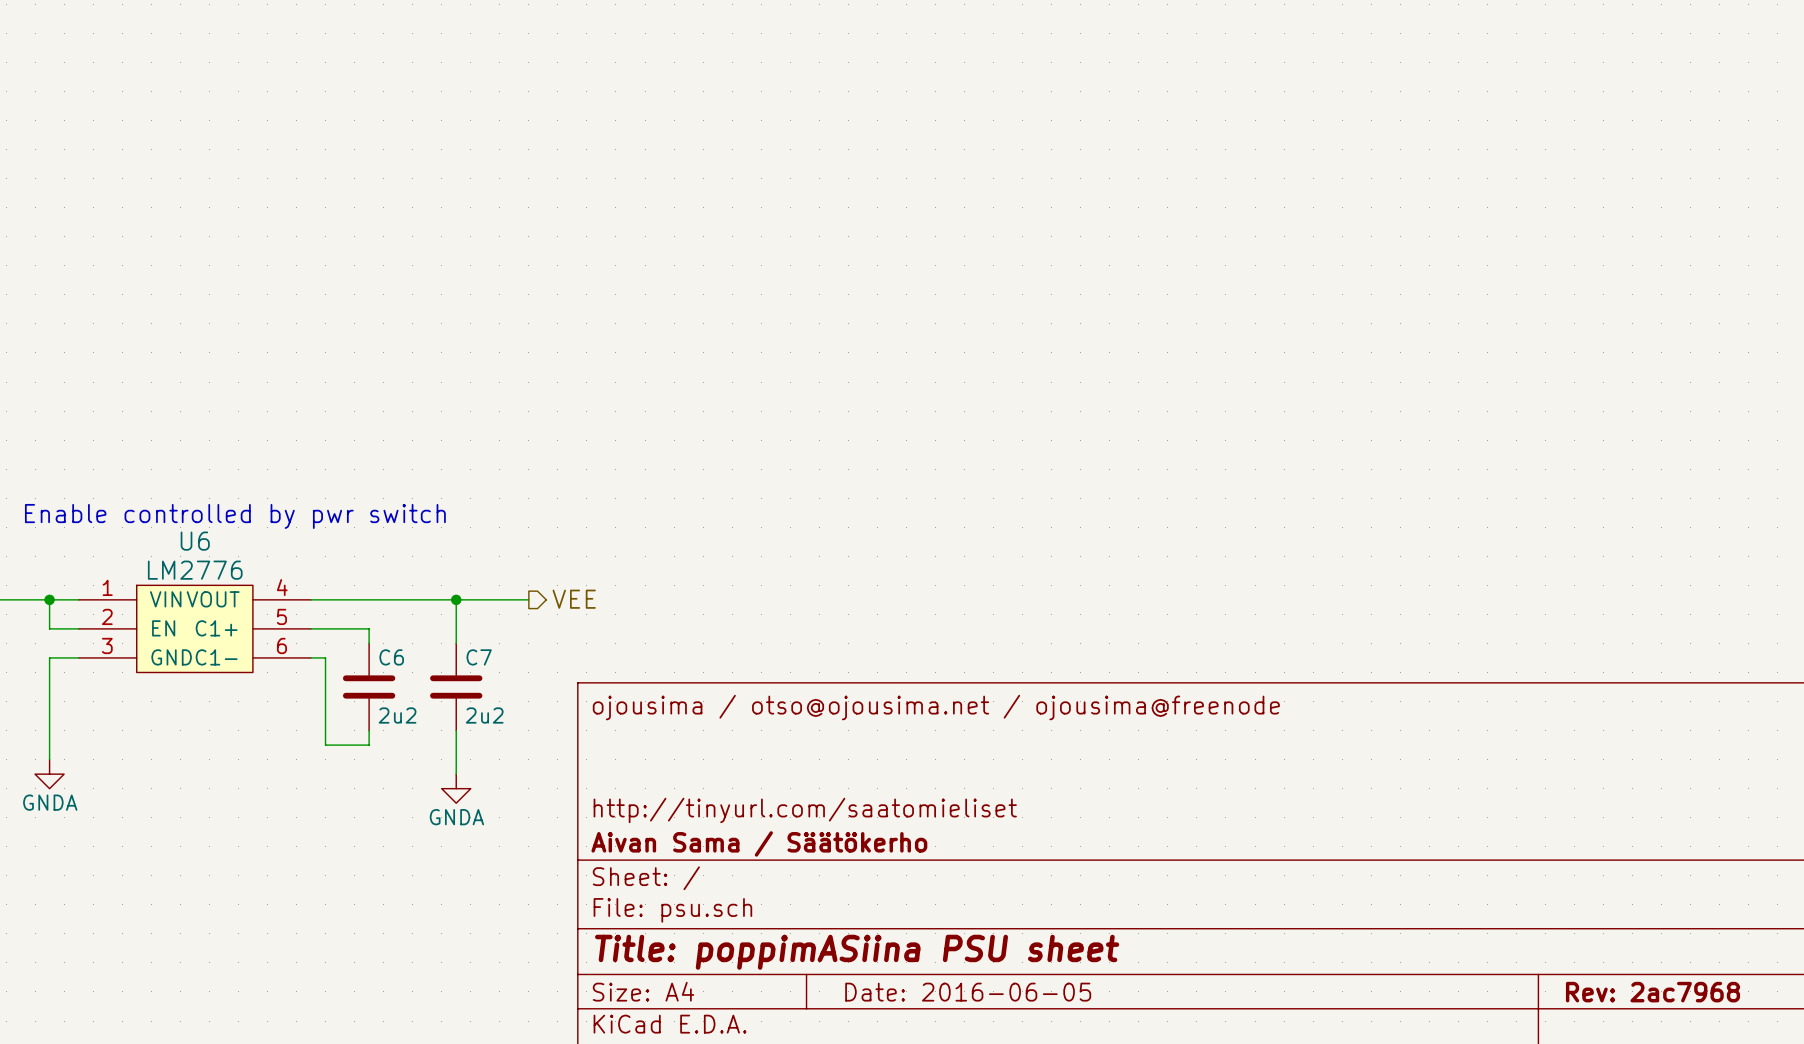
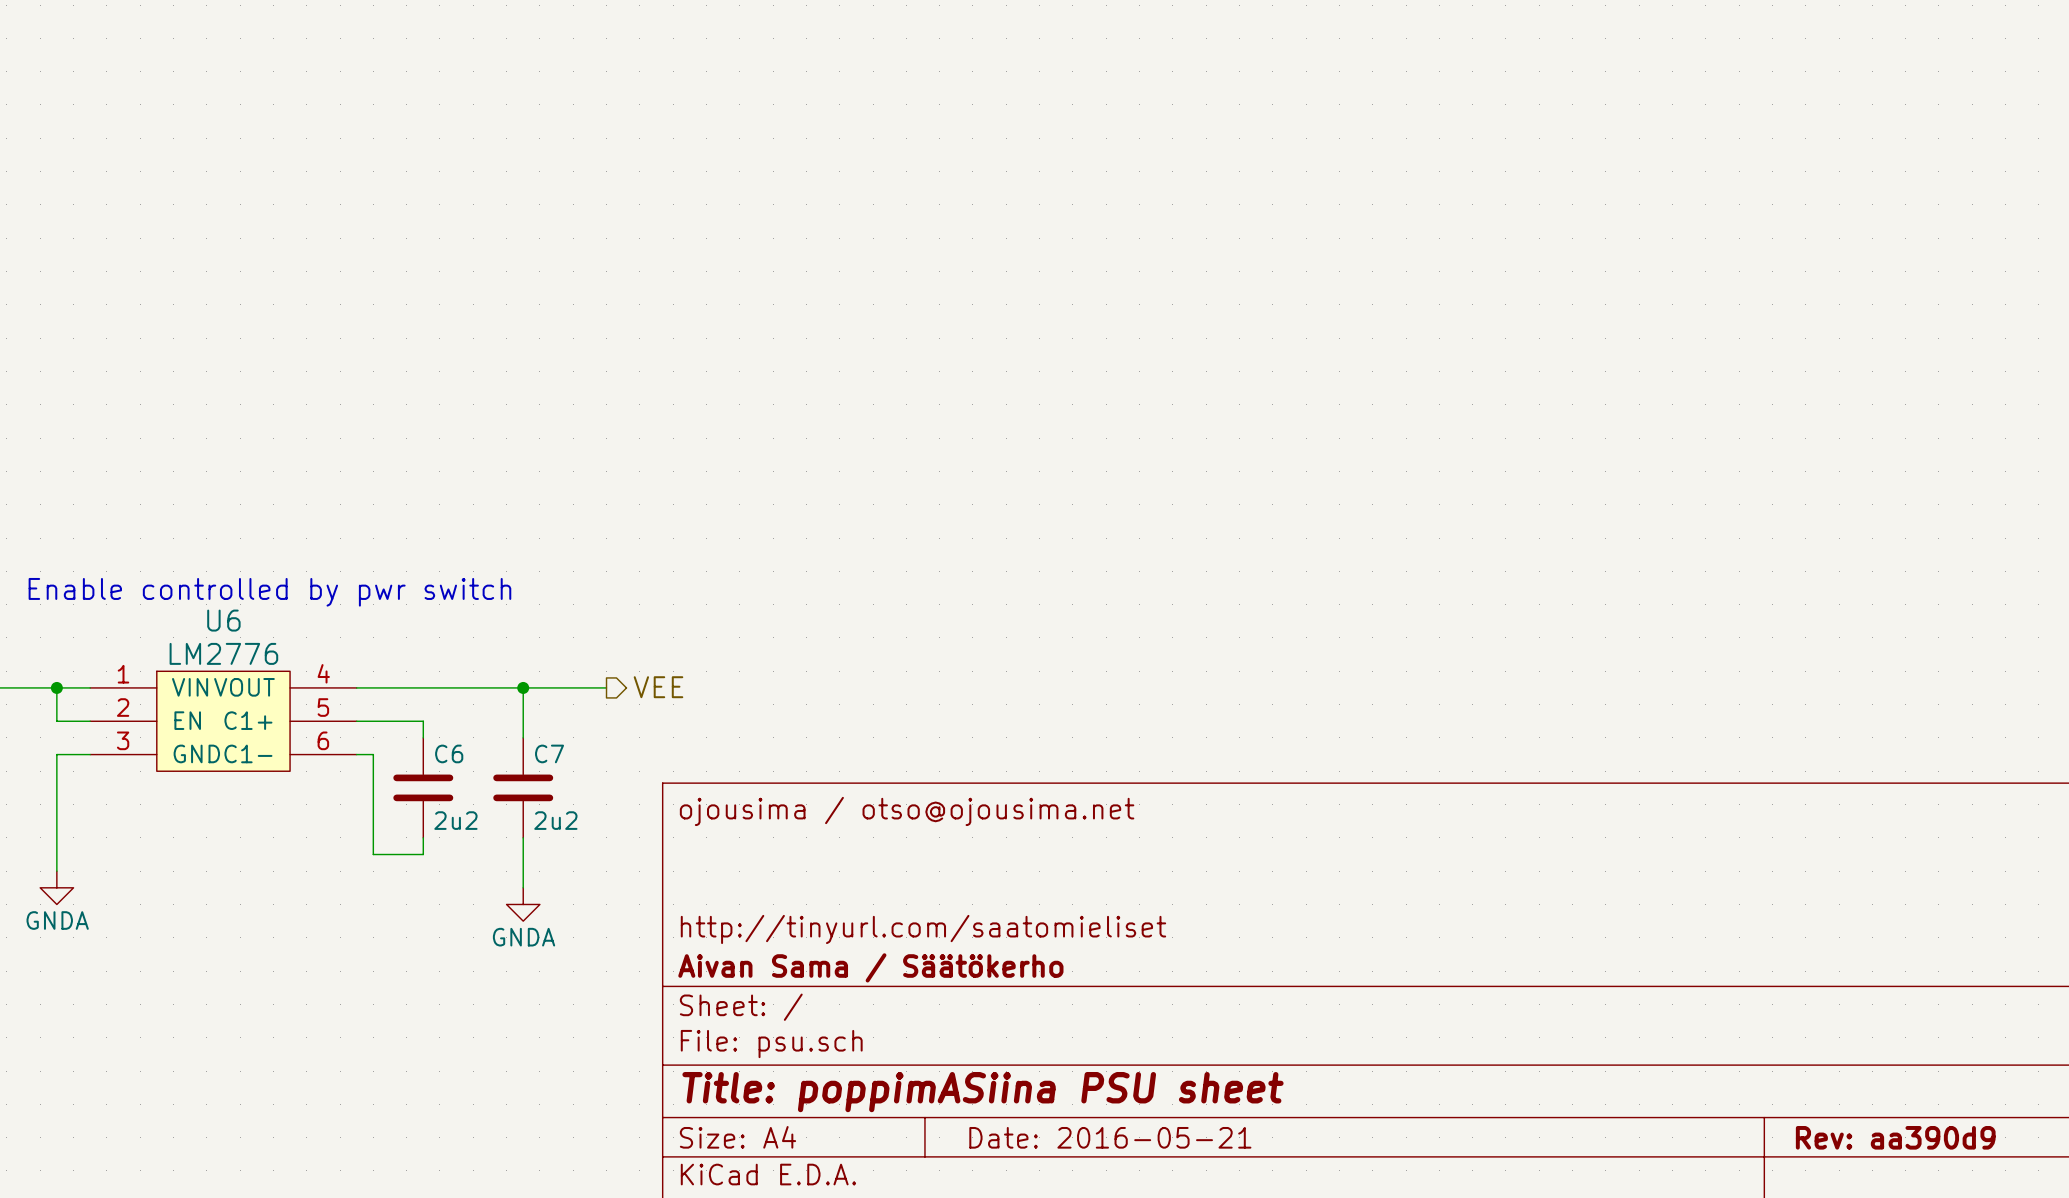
title block: ojousima / otso@ojousima.net / ojousima@freenode (936, 707) -> ojousima / otso@ojousima.net (907, 811)
title block: Date: 2016-06-05 (968, 992) -> Date: 2016-05-21 (1110, 1137)
title block: Rev: 2ac7968 (1652, 992) -> Rev: aa390d9 (1895, 1137)

